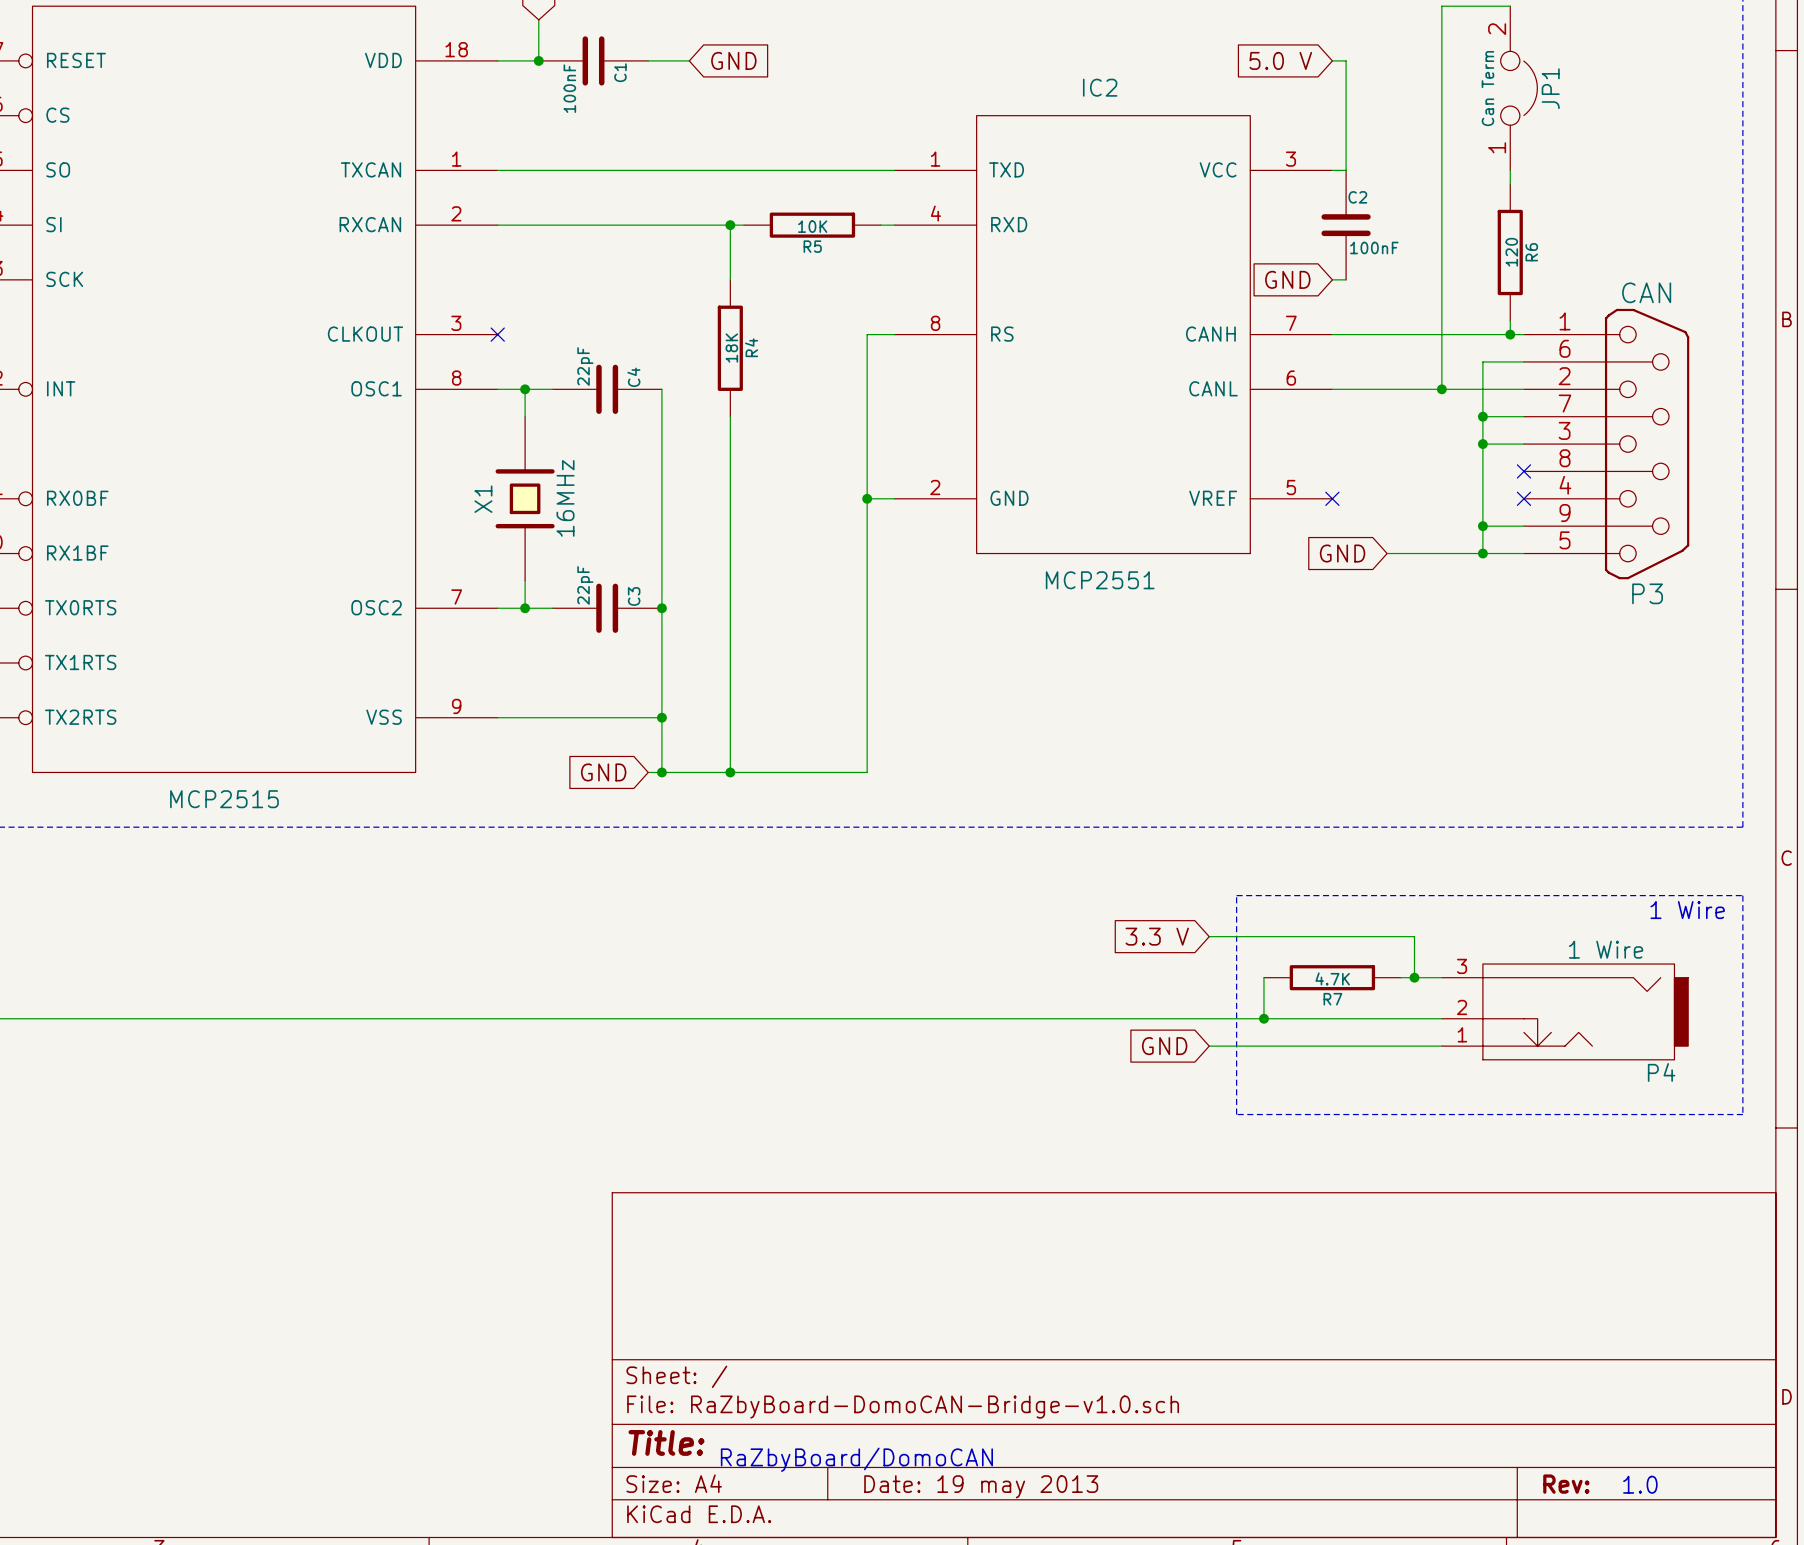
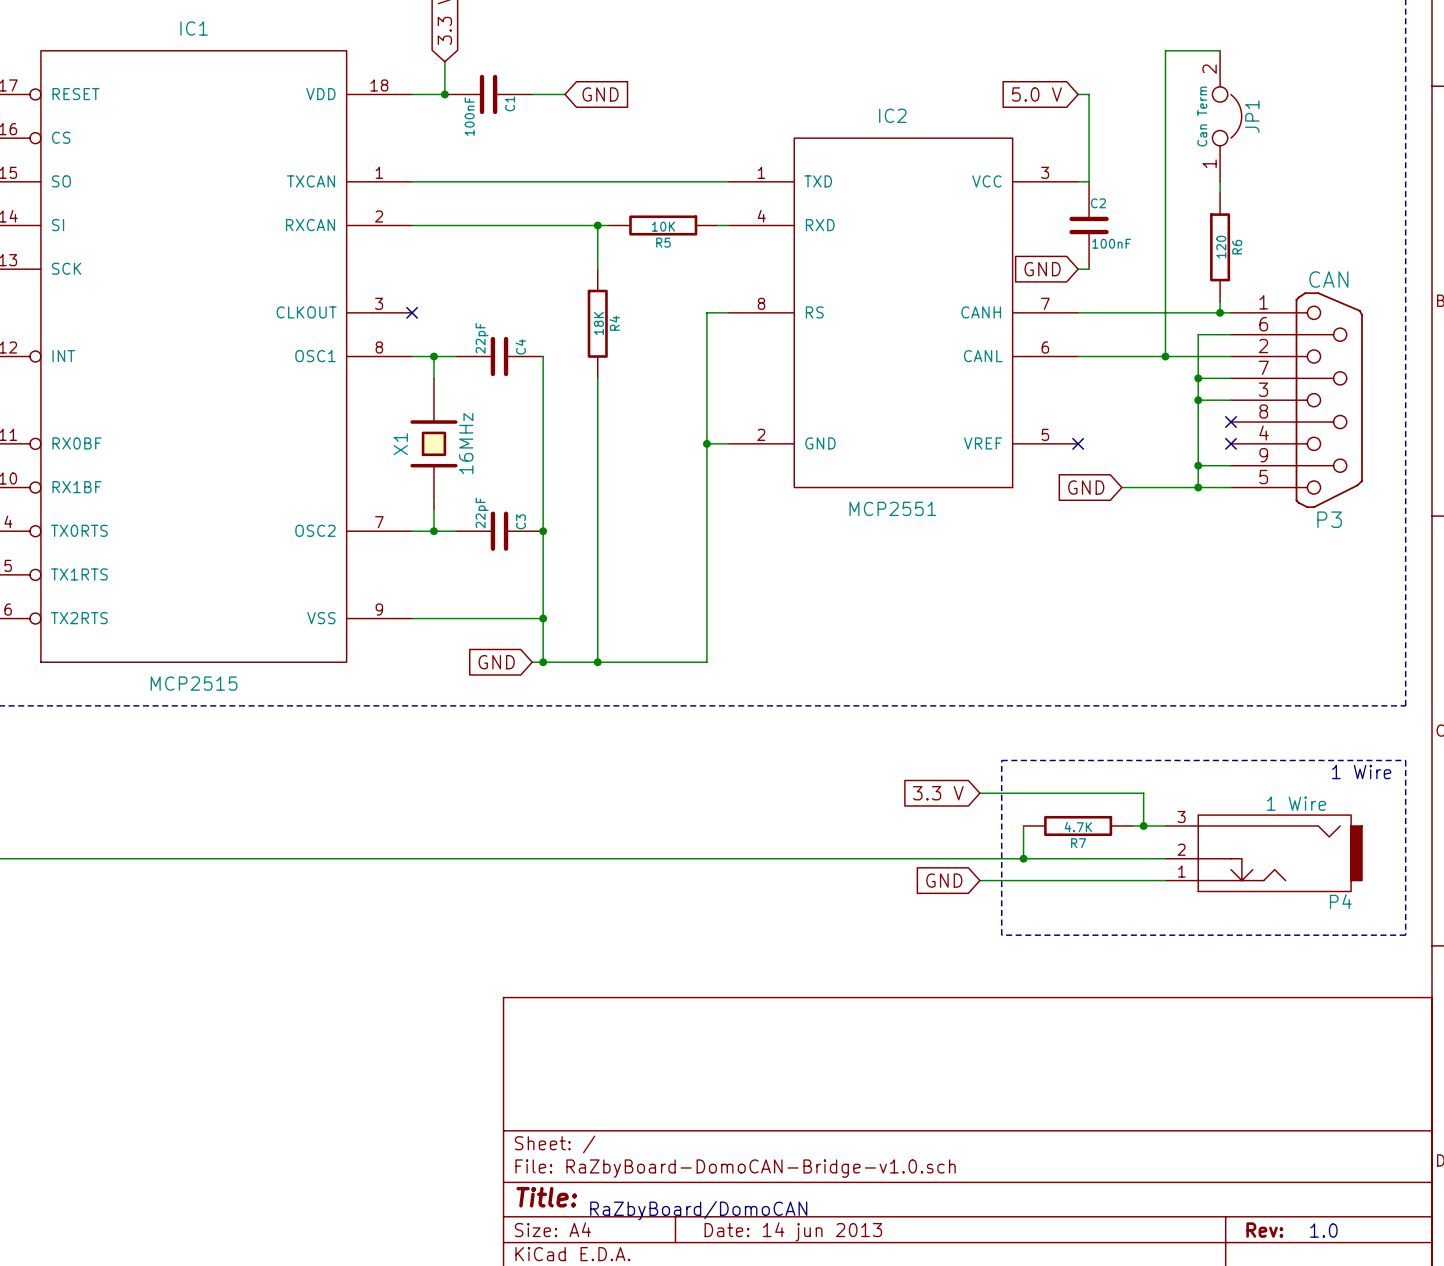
title block: Date: 19 may 2013 (981, 1486) -> Date: 14 jun 2013 (793, 1231)

